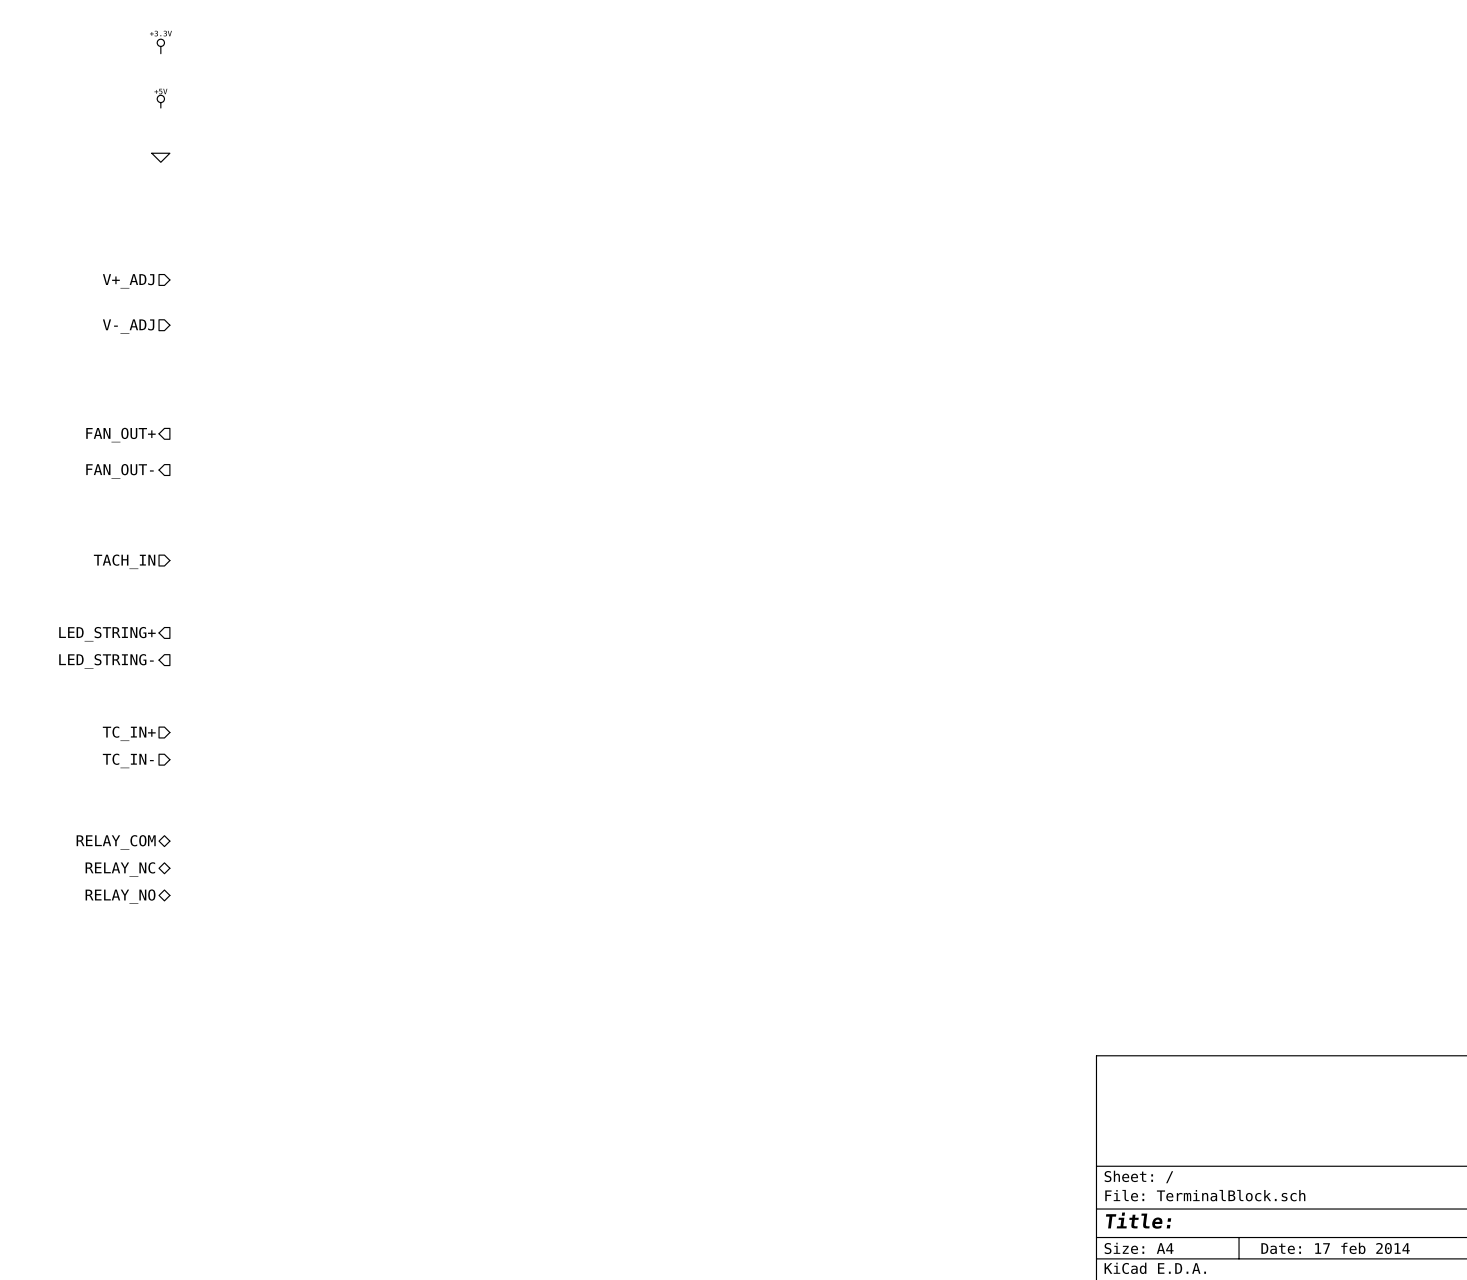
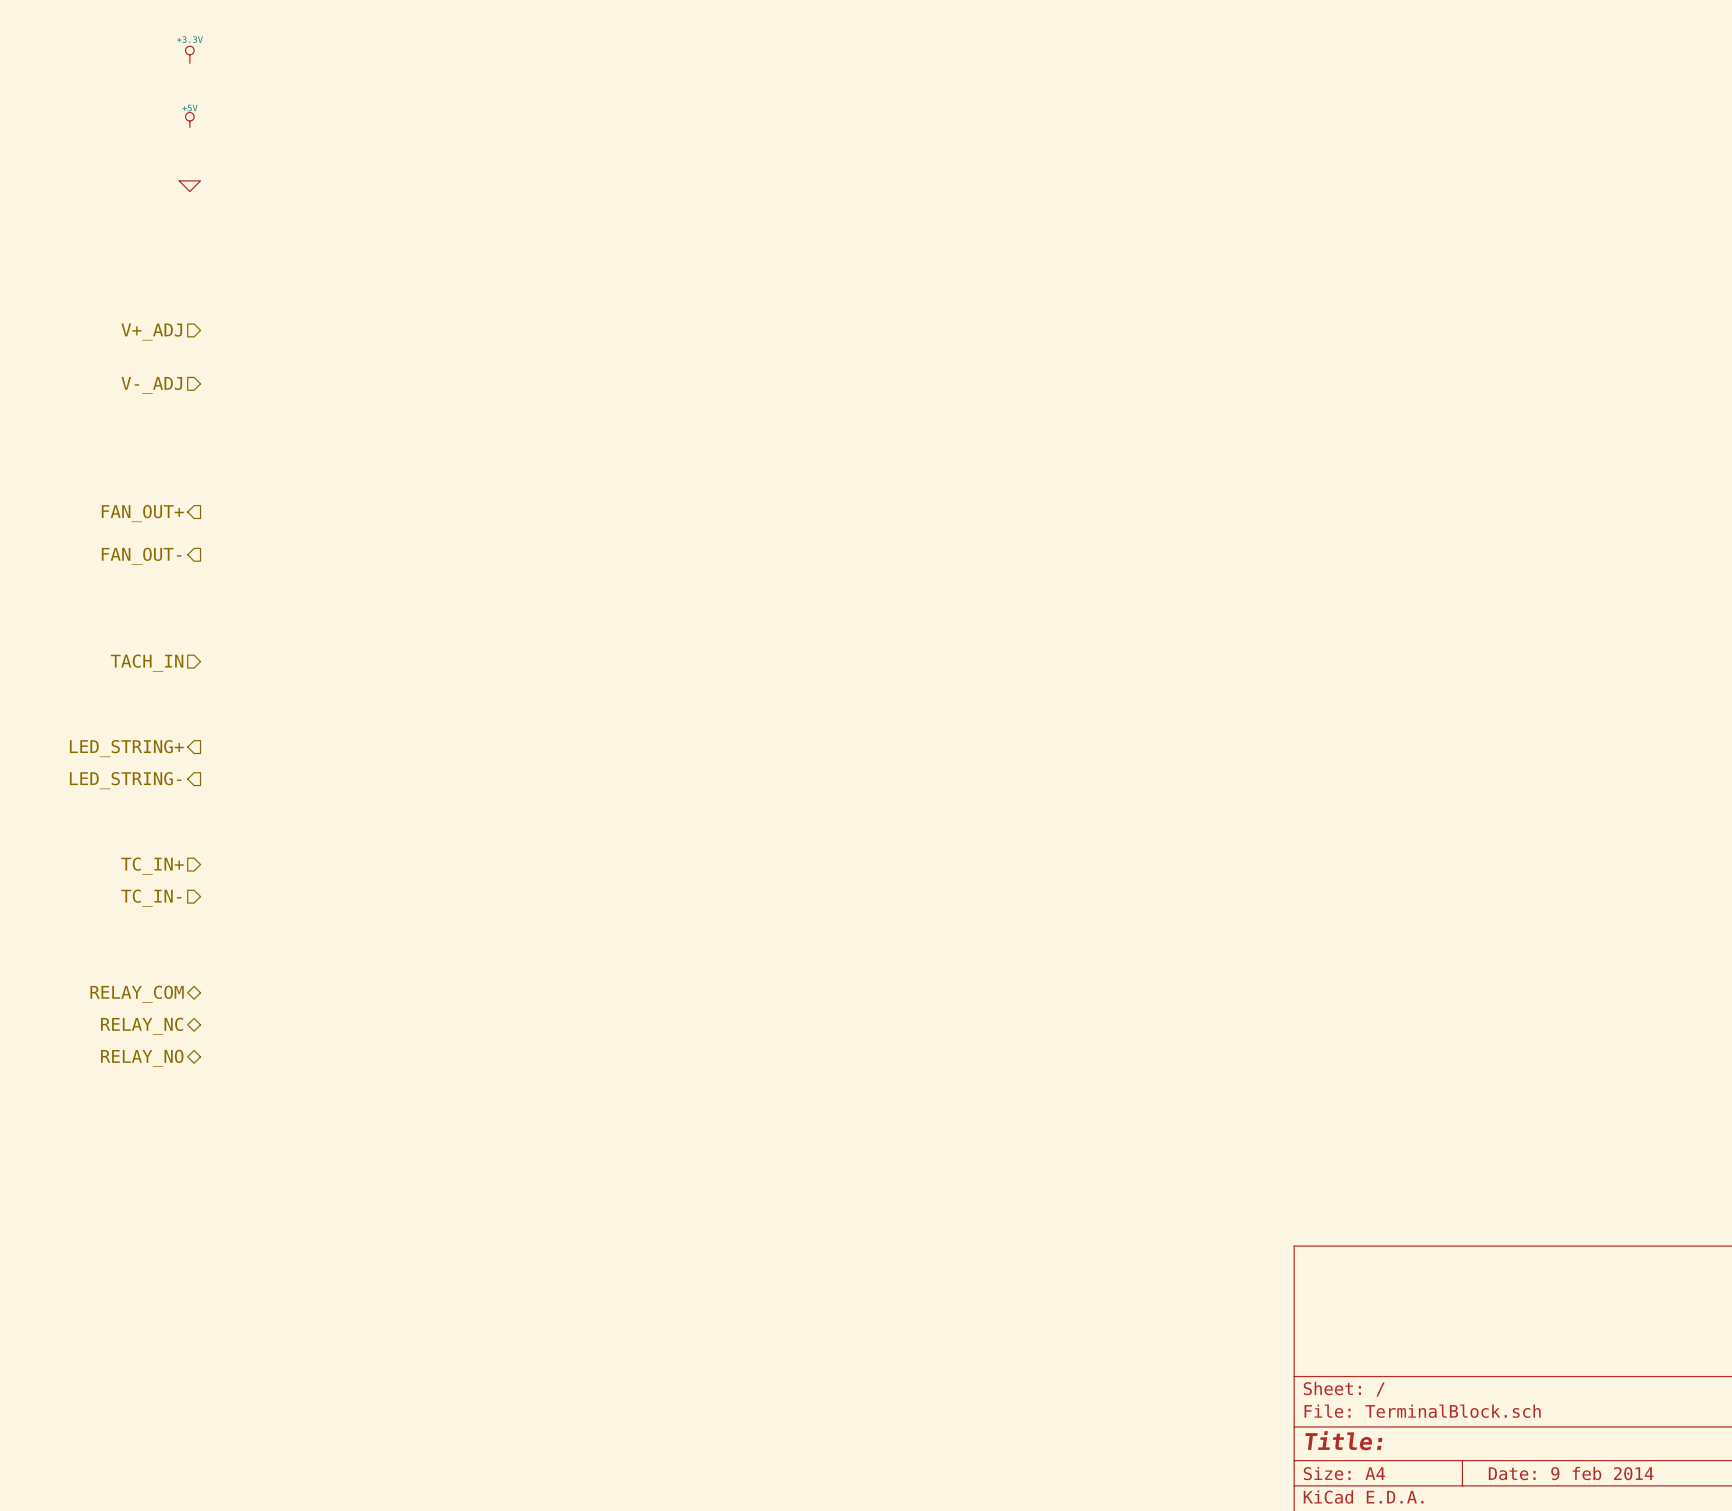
title block: Date: 17 feb 2014 (1335, 1248) -> Date: 9 feb 2014 (1571, 1473)

